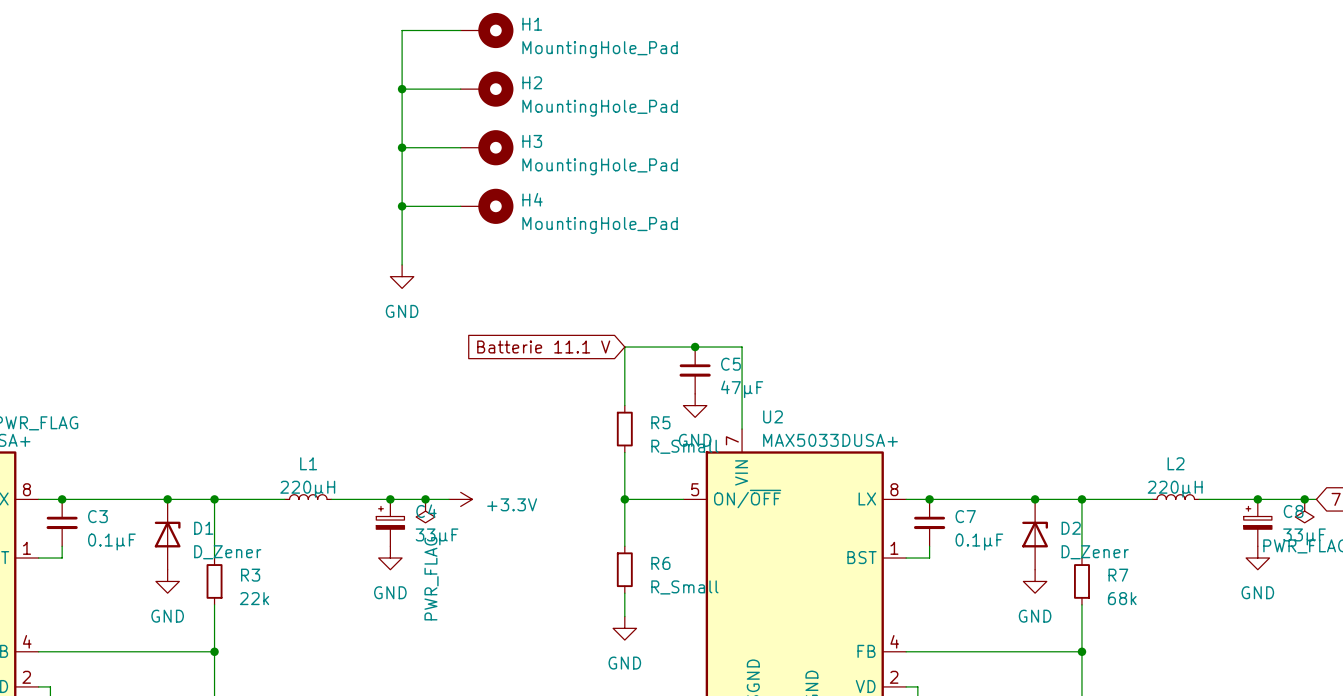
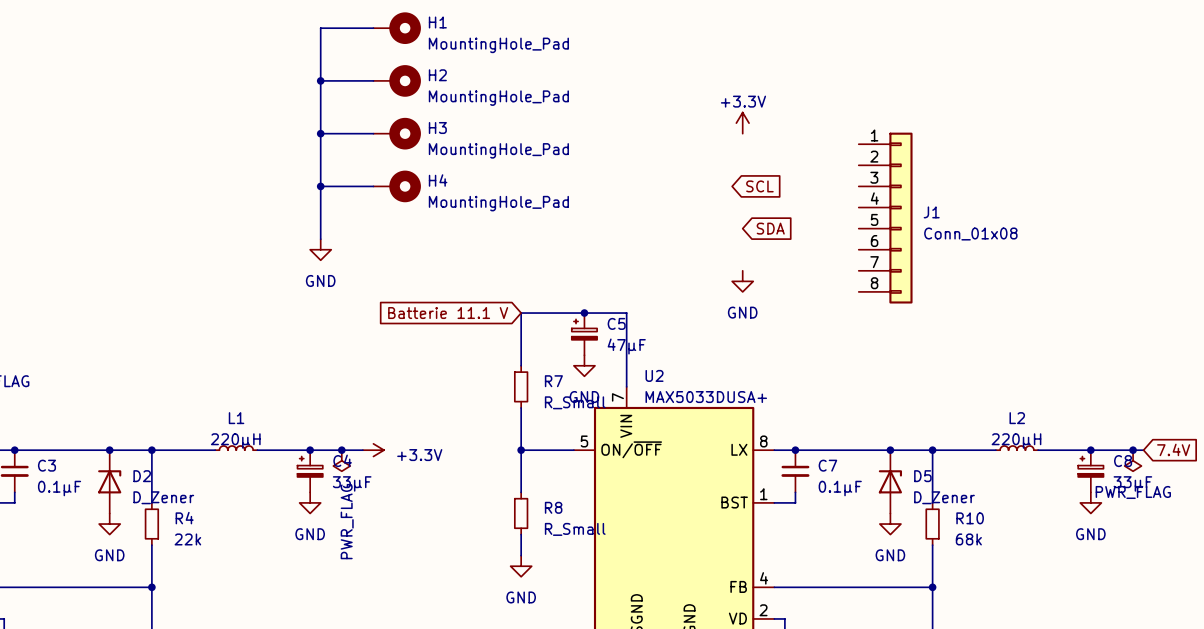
power symbol: none -> +3.3V (742, 123)
global label: none -> SCL (759, 186)
J1: none -> Conn_01x08 (885, 218)
global label: none -> SDA (770, 228)
power symbol: none -> GND (742, 281)
C5 symbol: [679, 347, 711, 394] -> [571, 313, 598, 356]
R5 name: R5 (660, 422) -> R7 (553, 381)
D1 name: D1 (203, 528) -> D2 (142, 476)
D2 name: D2 (1071, 528) -> D5 (922, 476)
R6 name: R6 (660, 563) -> R8 (553, 507)
R3 name: R3 (250, 575) -> R4 (184, 518)
R7 name: R7 (1118, 575) -> R10 (970, 518)

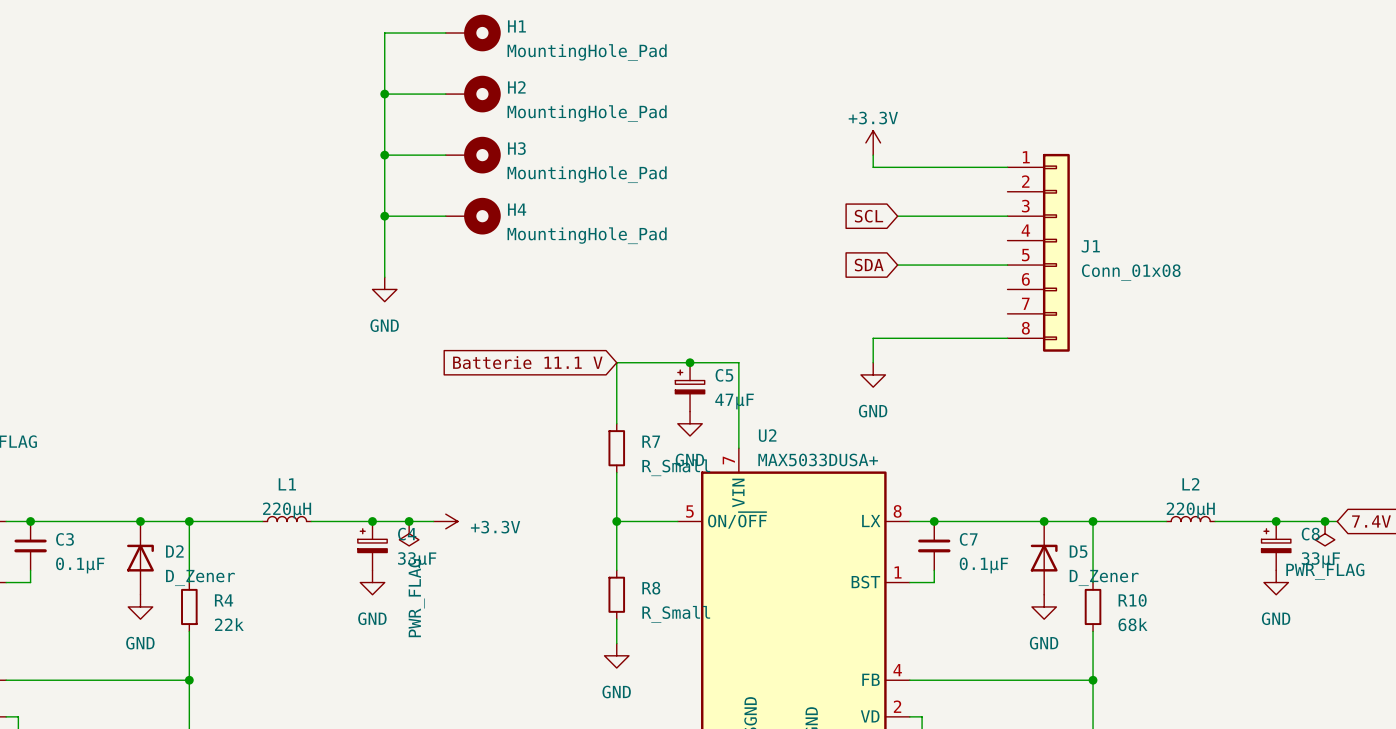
wire: none -> (873, 155) (873, 167) (1007, 167)
global label rotation: 0° (759, 186) -> 180° (868, 216)
wire: none -> (897, 216) (1007, 216)
wire: none -> (897, 265) (1007, 265)
global label rotation: 0° (770, 228) -> 180° (869, 265)
power symbol position: GND (742, 281) -> GND (873, 374)
wire: none -> (1007, 338) (873, 338) (873, 362)

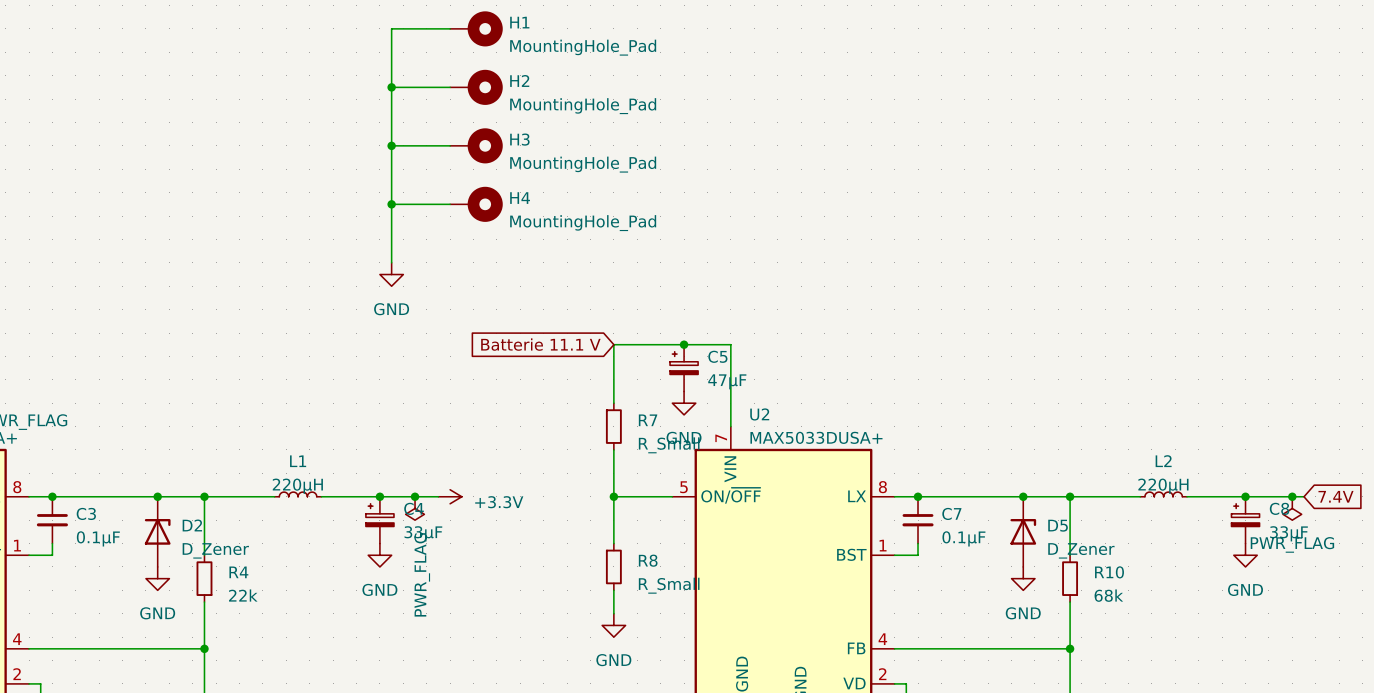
power symbol: +3.3V (873, 142) -> none
wire: (873, 155) (873, 167) (1007, 167) -> none
global label: SCL (868, 216) -> none
wire: (897, 216) (1007, 216) -> none
J1: Conn_01x08 (1038, 252) -> none
global label: SDA (869, 265) -> none
wire: (897, 265) (1007, 265) -> none
wire: (1007, 338) (873, 338) (873, 362) -> none
power symbol: GND (873, 374) -> none

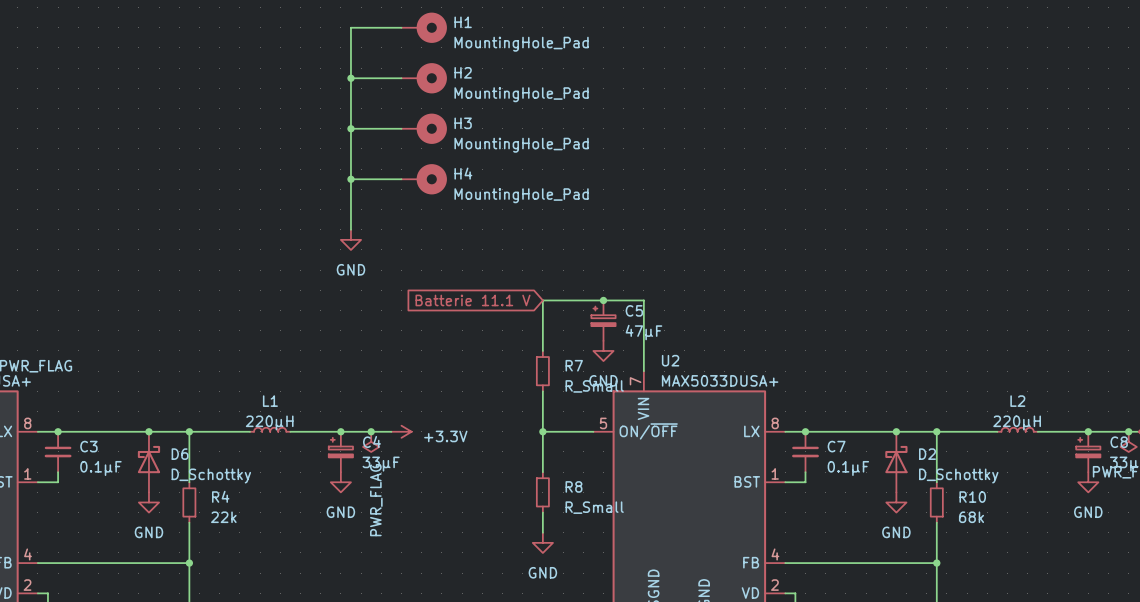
D2 symbol: [144, 496, 171, 567] -> [885, 431, 908, 493]
D6: none -> D_Schottky (148, 462)
D5: D_Zener (1023, 531) -> none
D2 value: D_Zener (215, 550) -> D_Schottky (958, 476)

